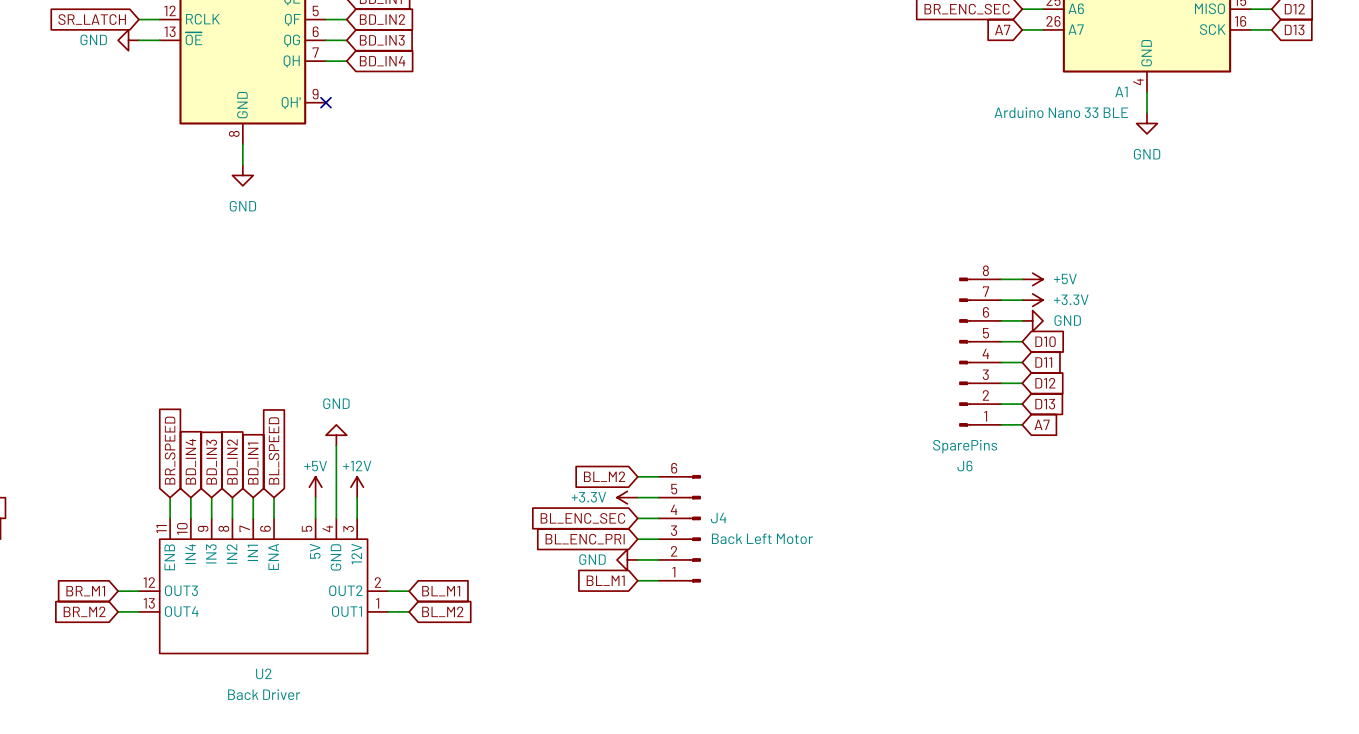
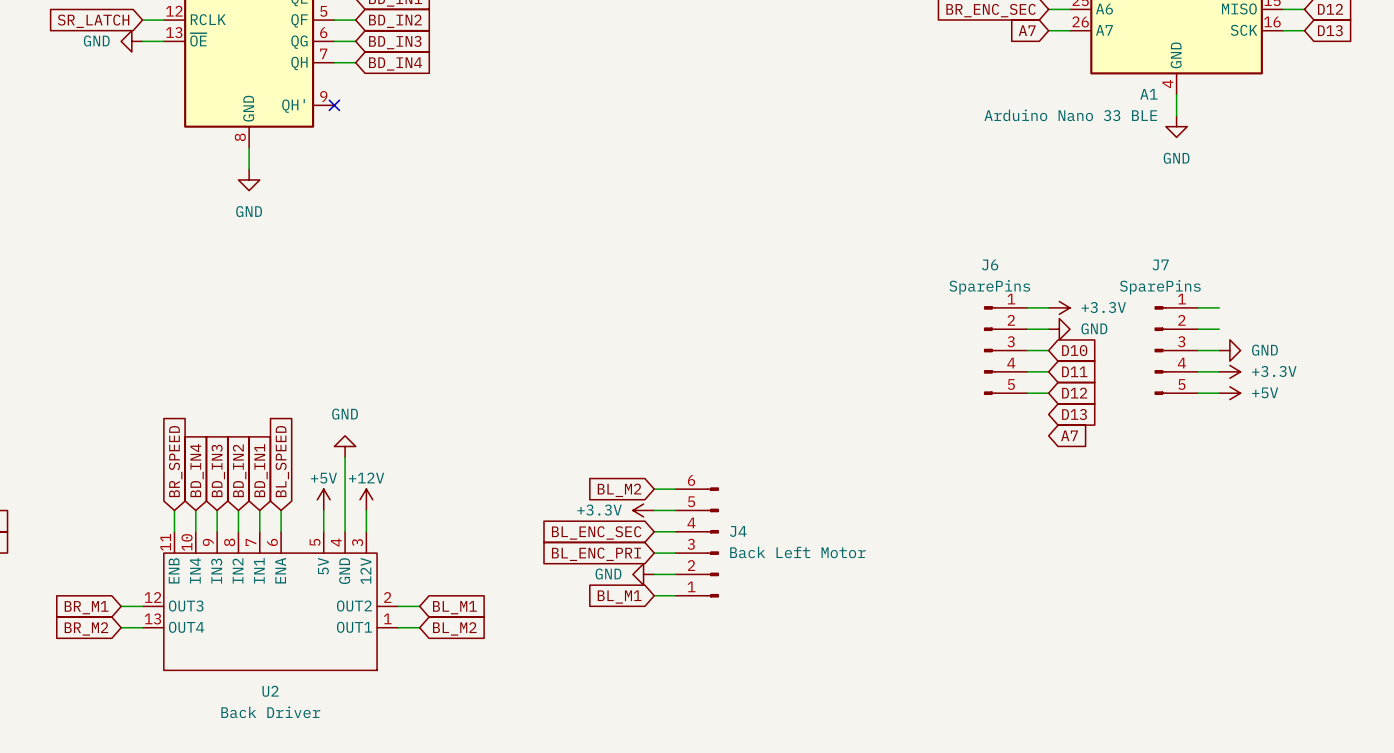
J6 symbol: [959, 277, 1002, 427] -> [984, 306, 1028, 395]
wire: (1001, 279) (1022, 279) -> (1197, 307) (1219, 307)
power symbol position: +5V (1032, 279) -> +5V (1229, 393)
wire: none -> (1197, 329) (1219, 329)
J7: none -> SparePins (1176, 350)
wire: none -> (1197, 350) (1219, 350)
power symbol: none -> GND (1229, 350)
power symbol: none -> +3.3V (1229, 371)
wire: (1001, 404) (1022, 404) -> (1197, 371) (1219, 371)
wire: (1001, 424) (1022, 424) -> (1197, 393) (1219, 393)
J6 value position: SparePins (965, 446) -> SparePins (989, 287)
J6 name position: J6 (964, 466) -> J6 (990, 264)

